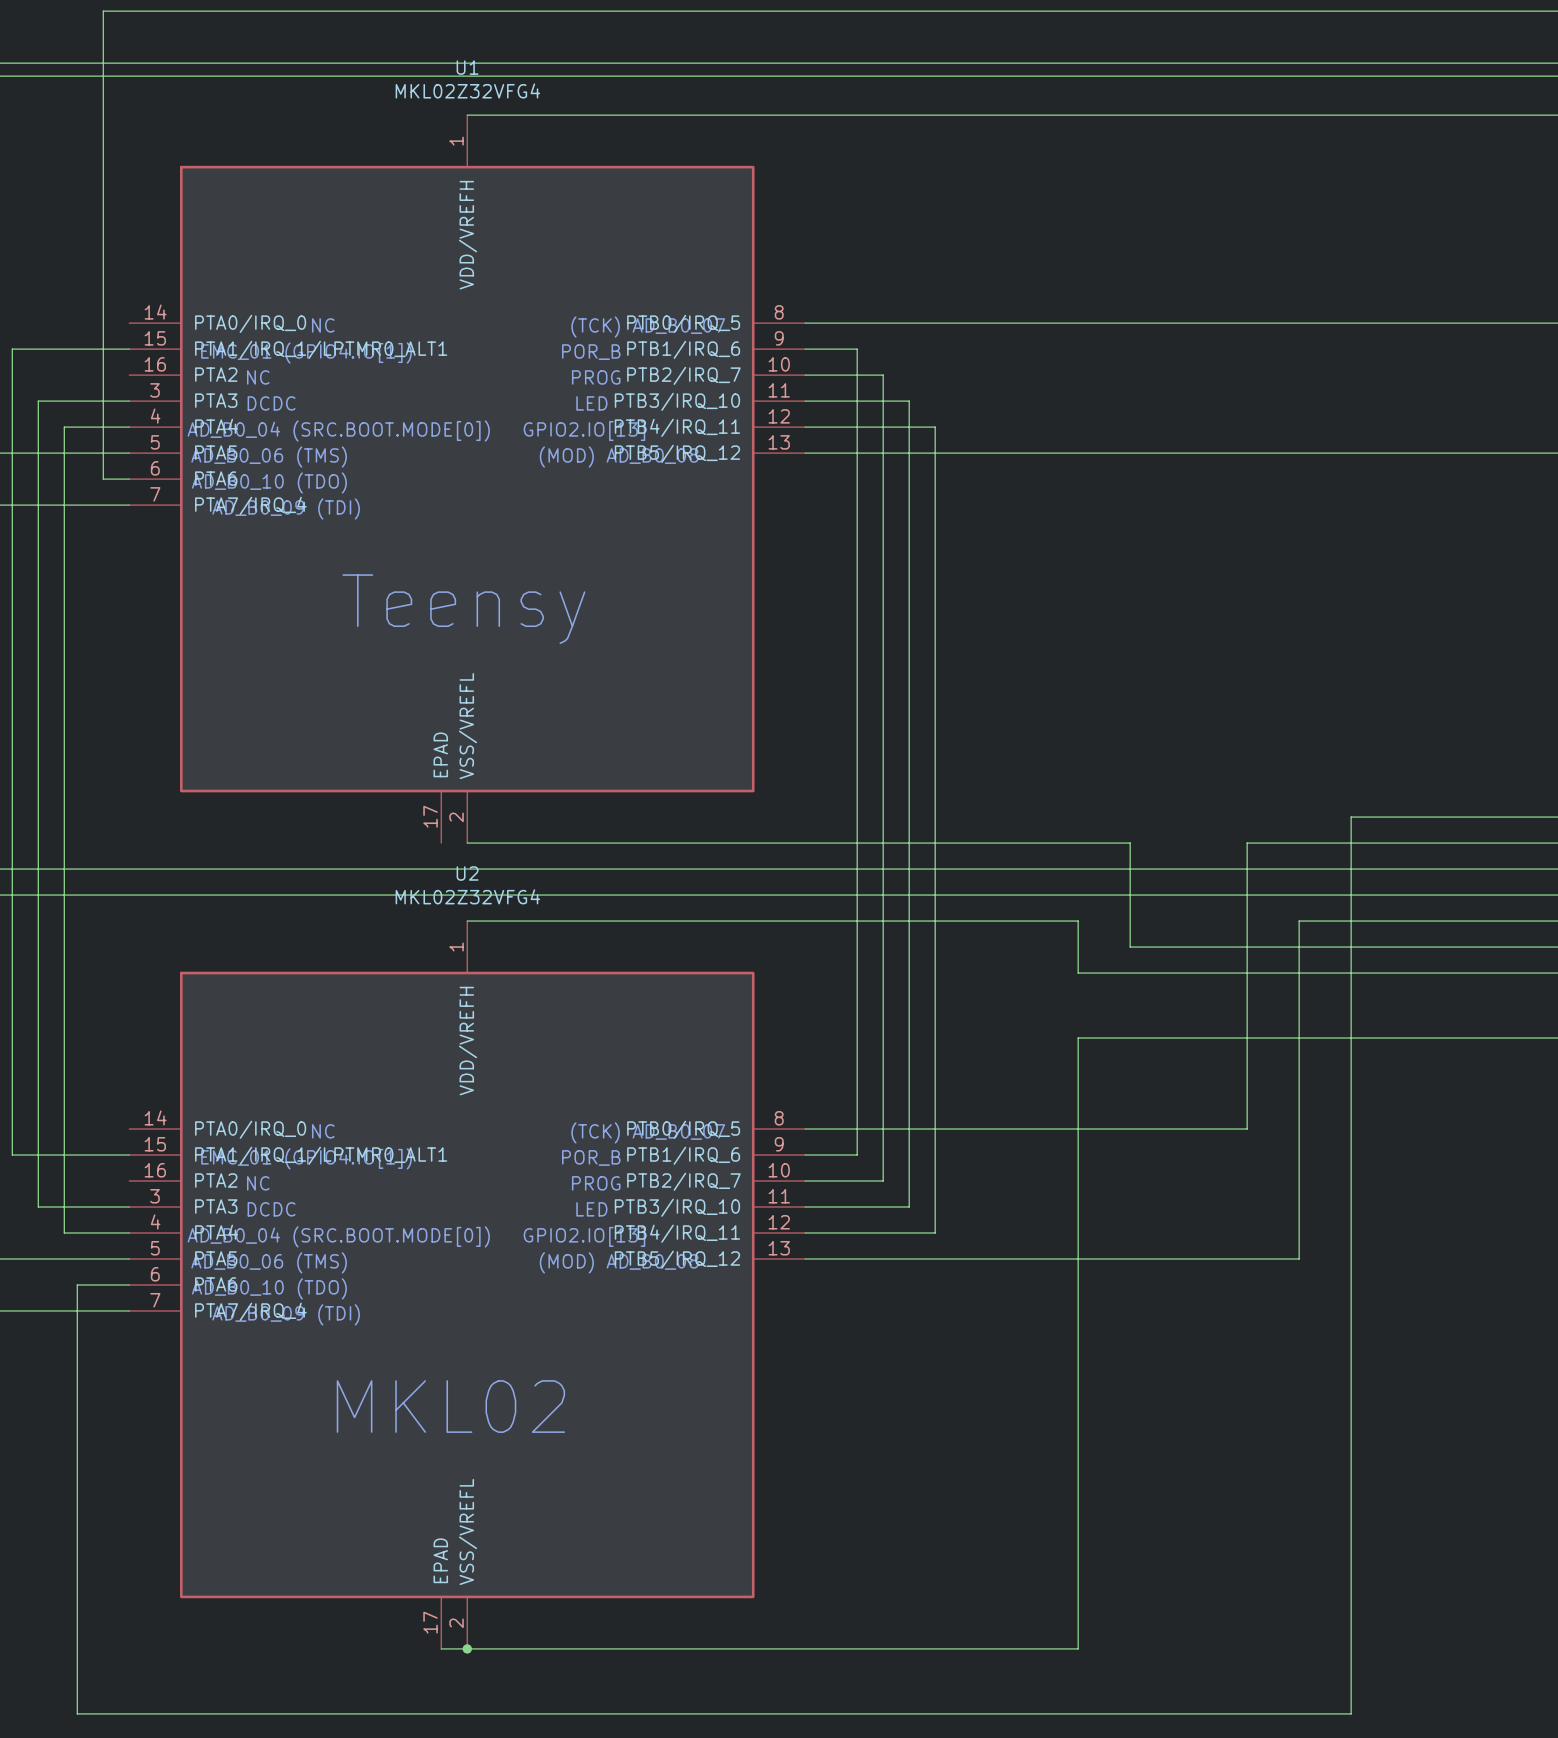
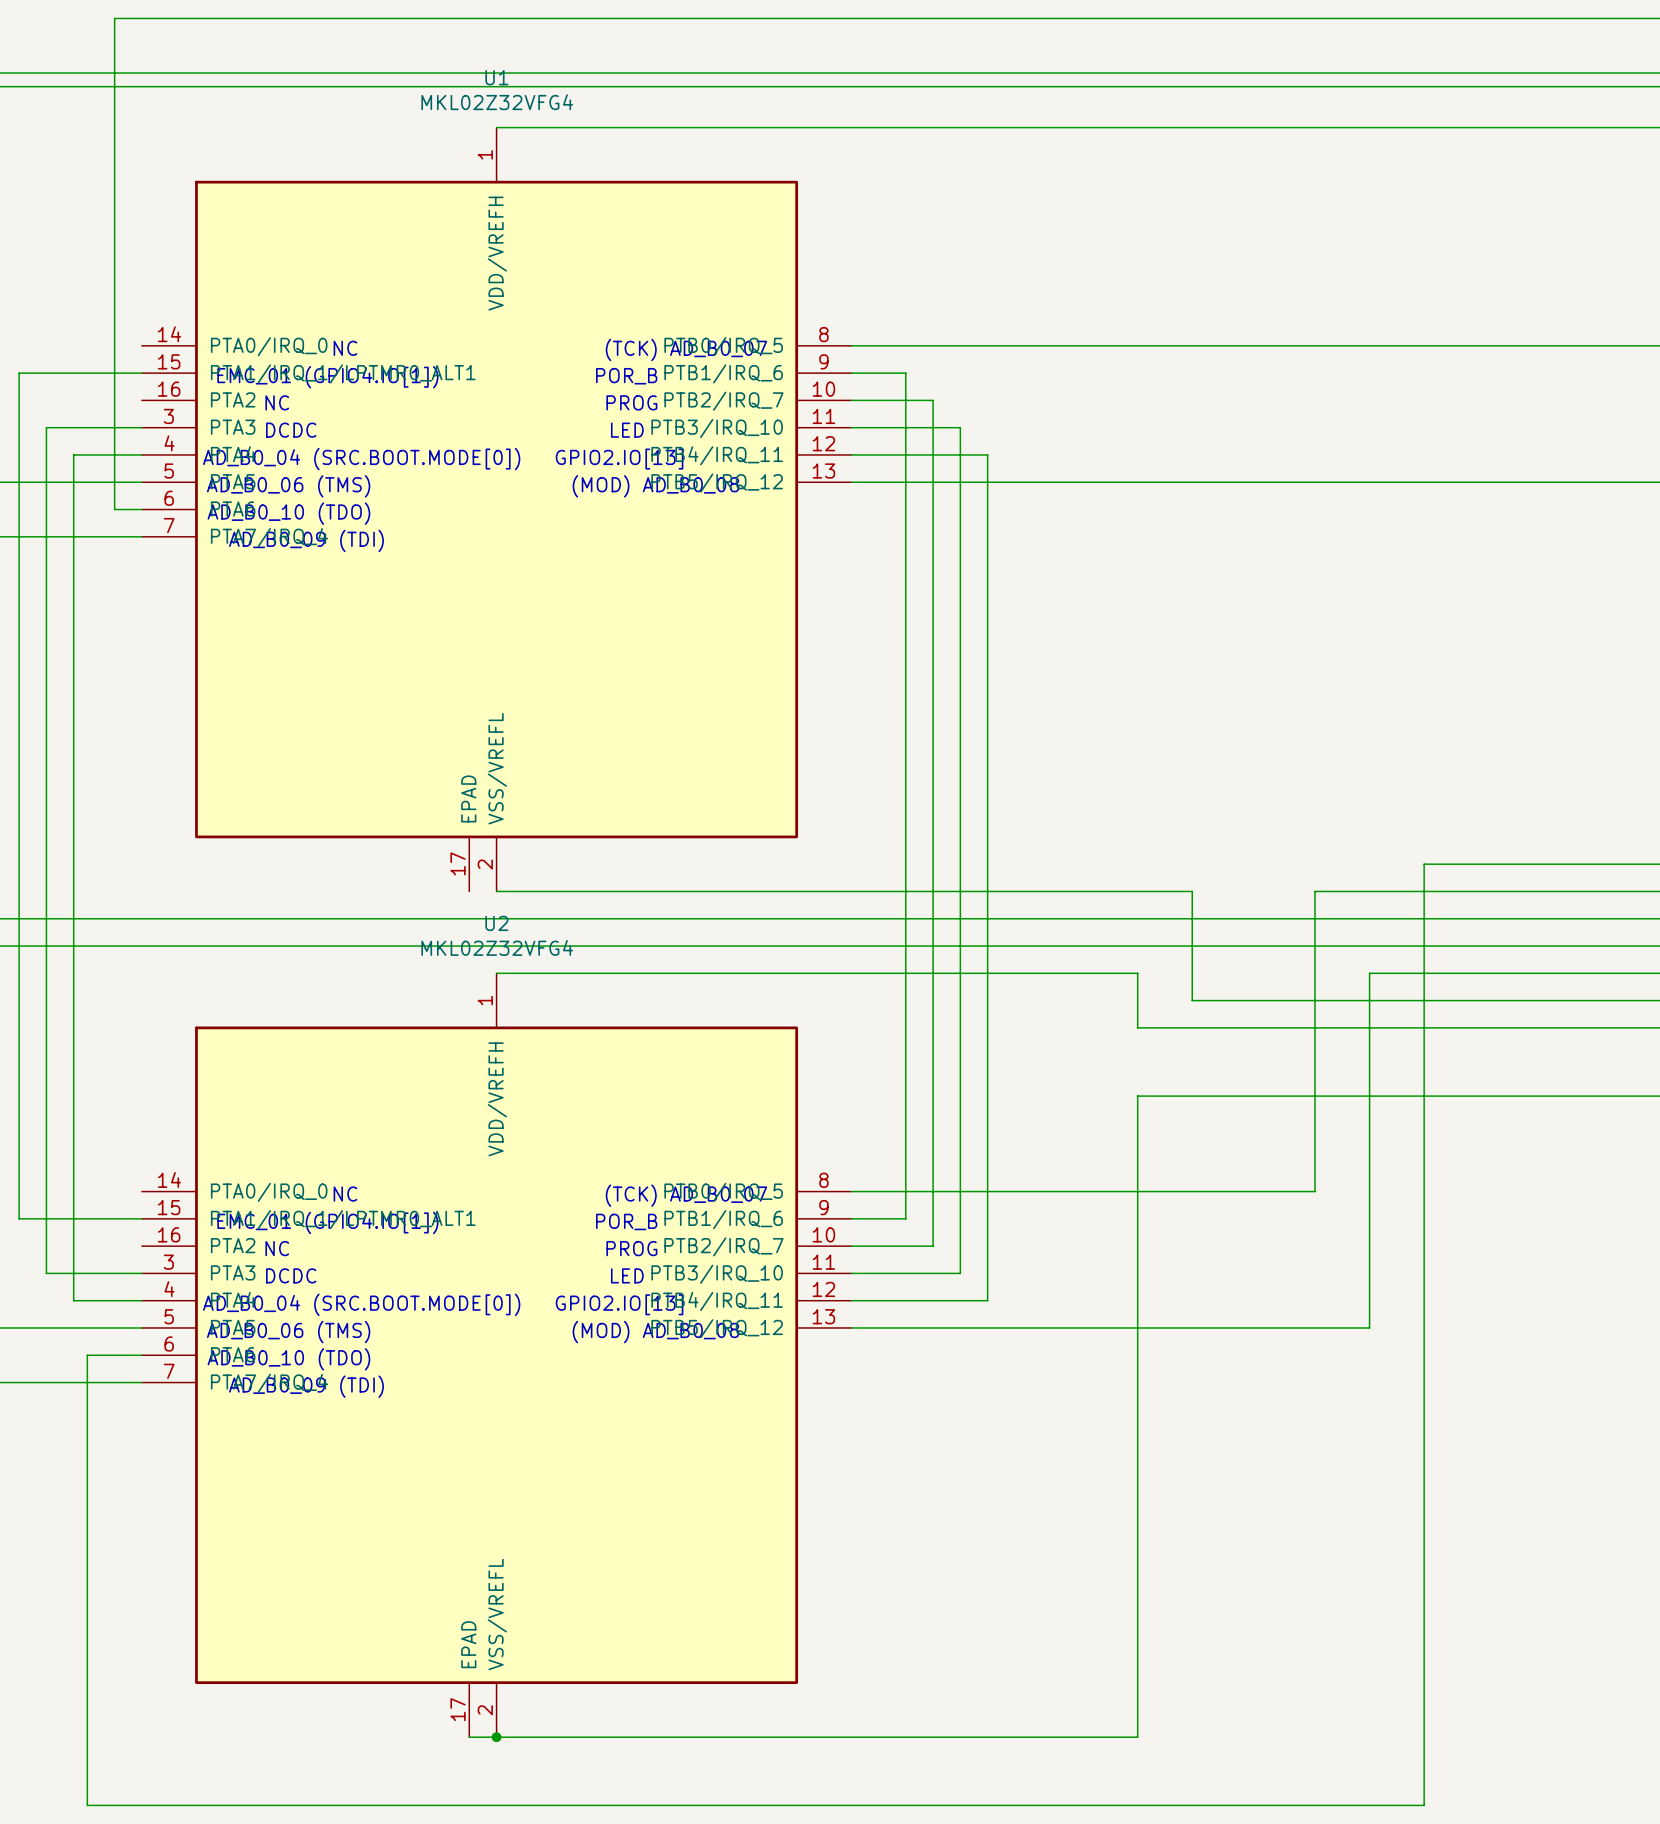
text: Teensy (463, 609) -> none
text: MKL02 (450, 1406) -> none

